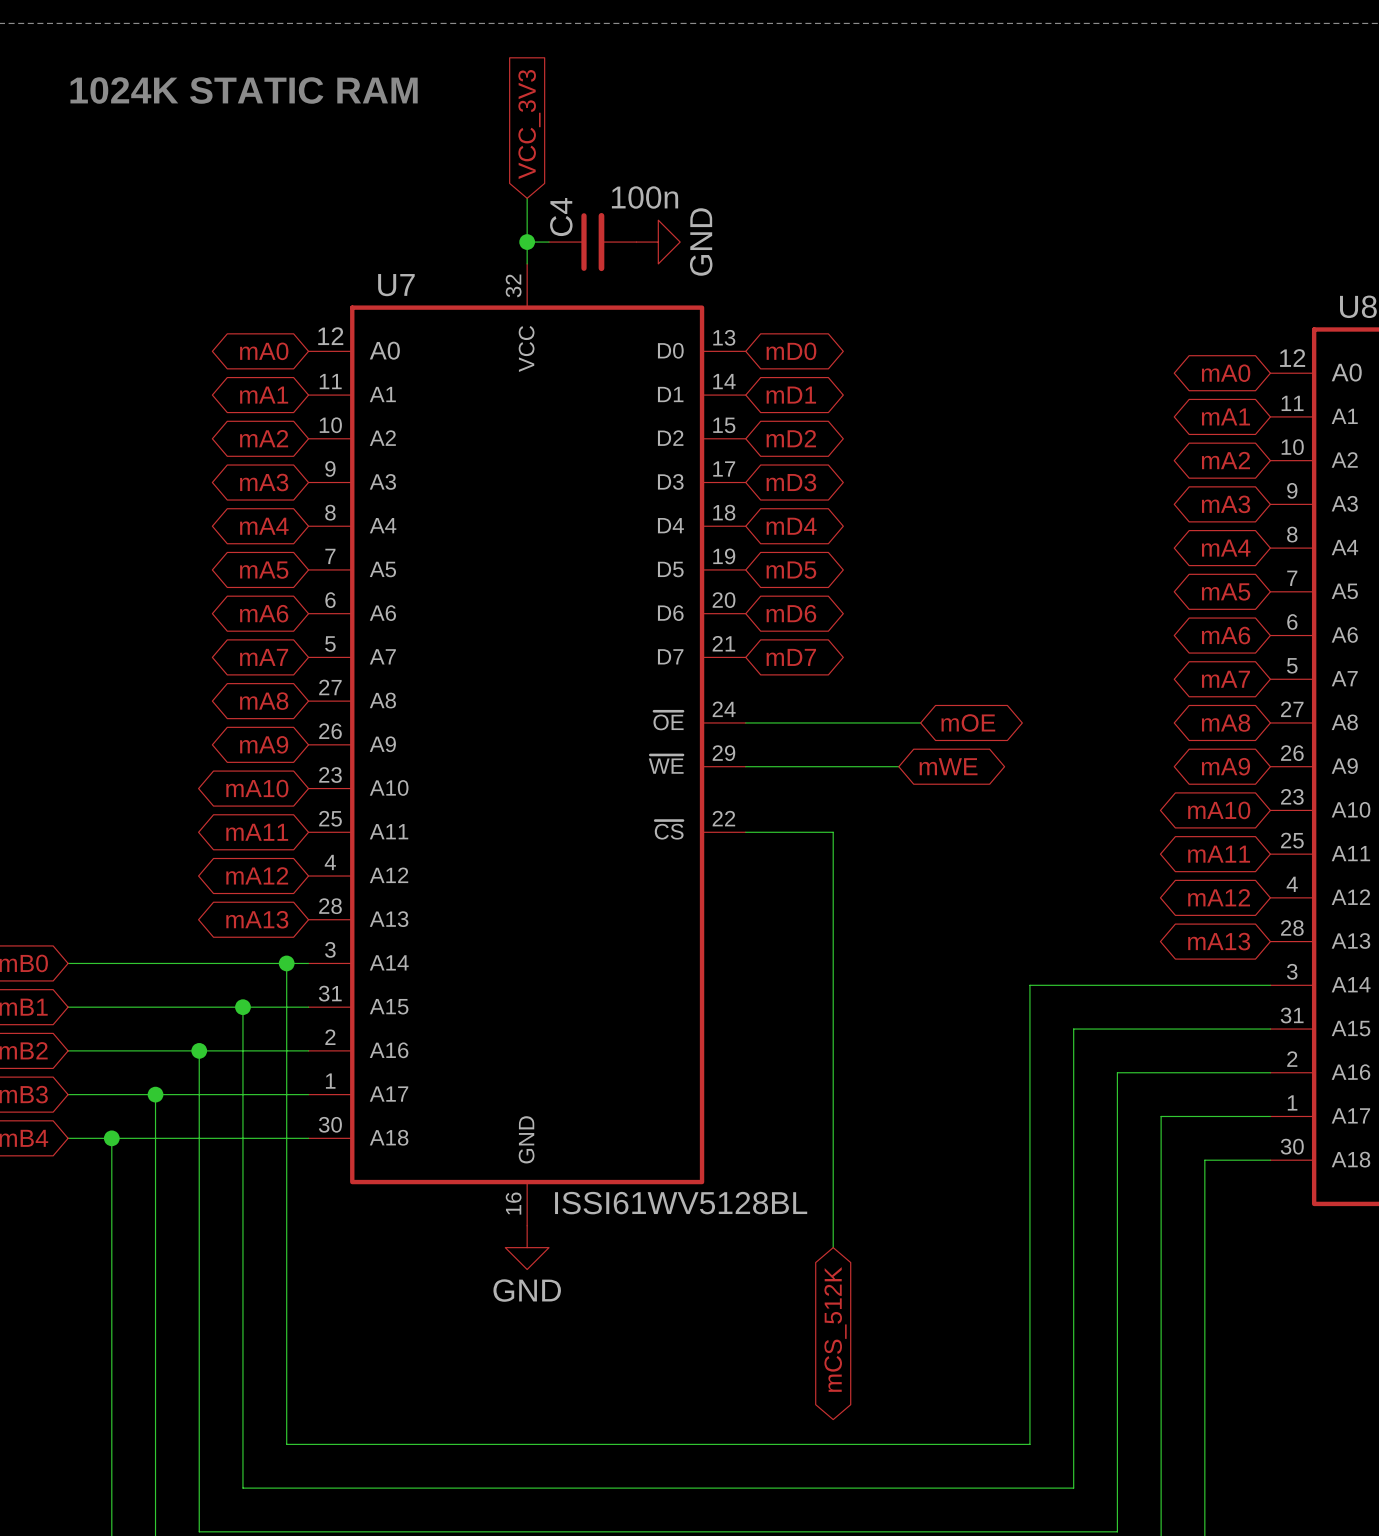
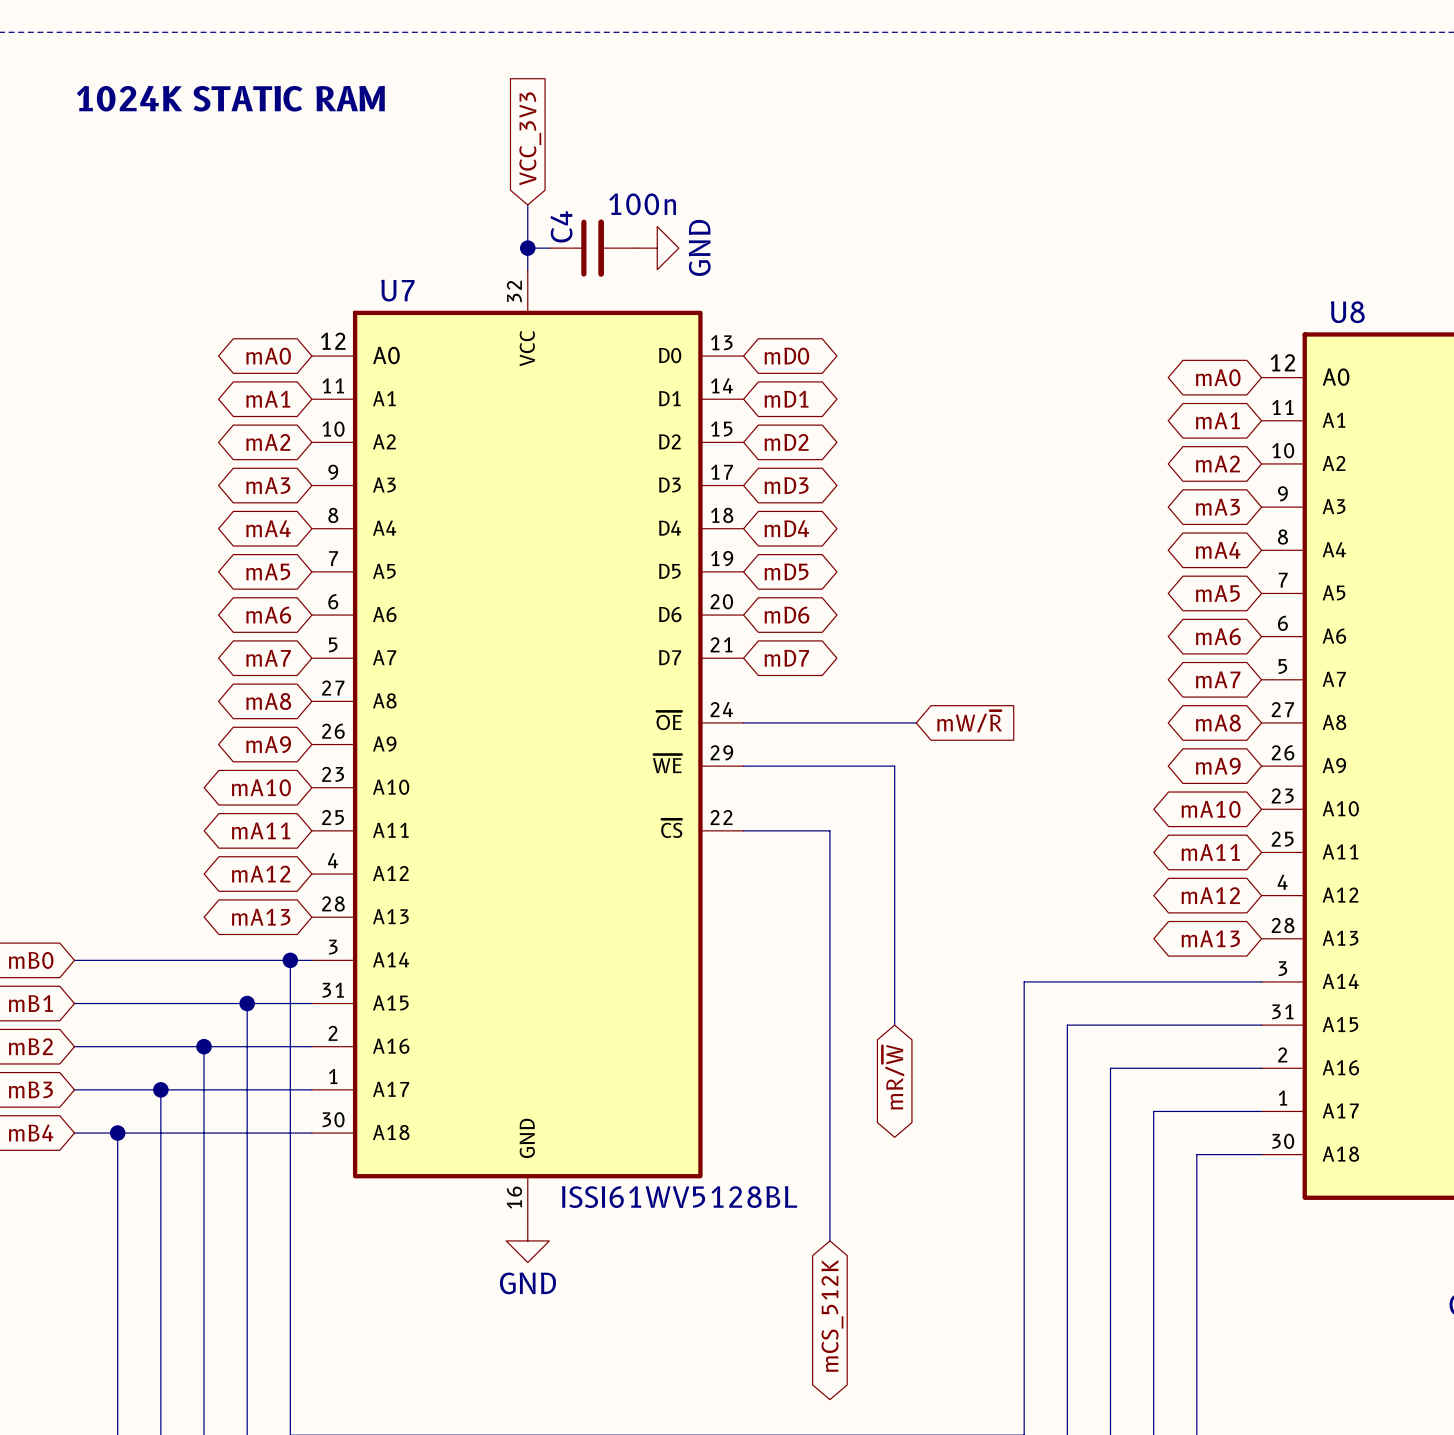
global label shape: bidirectional (968, 722) -> input (969, 721)
global label: mOE (968, 722) -> mW/~{R} (969, 721)
wire: none -> (894, 766) (894, 1025)
global label: mWE (948, 766) -> none
global label: none -> mR/~{W} (893, 1077)

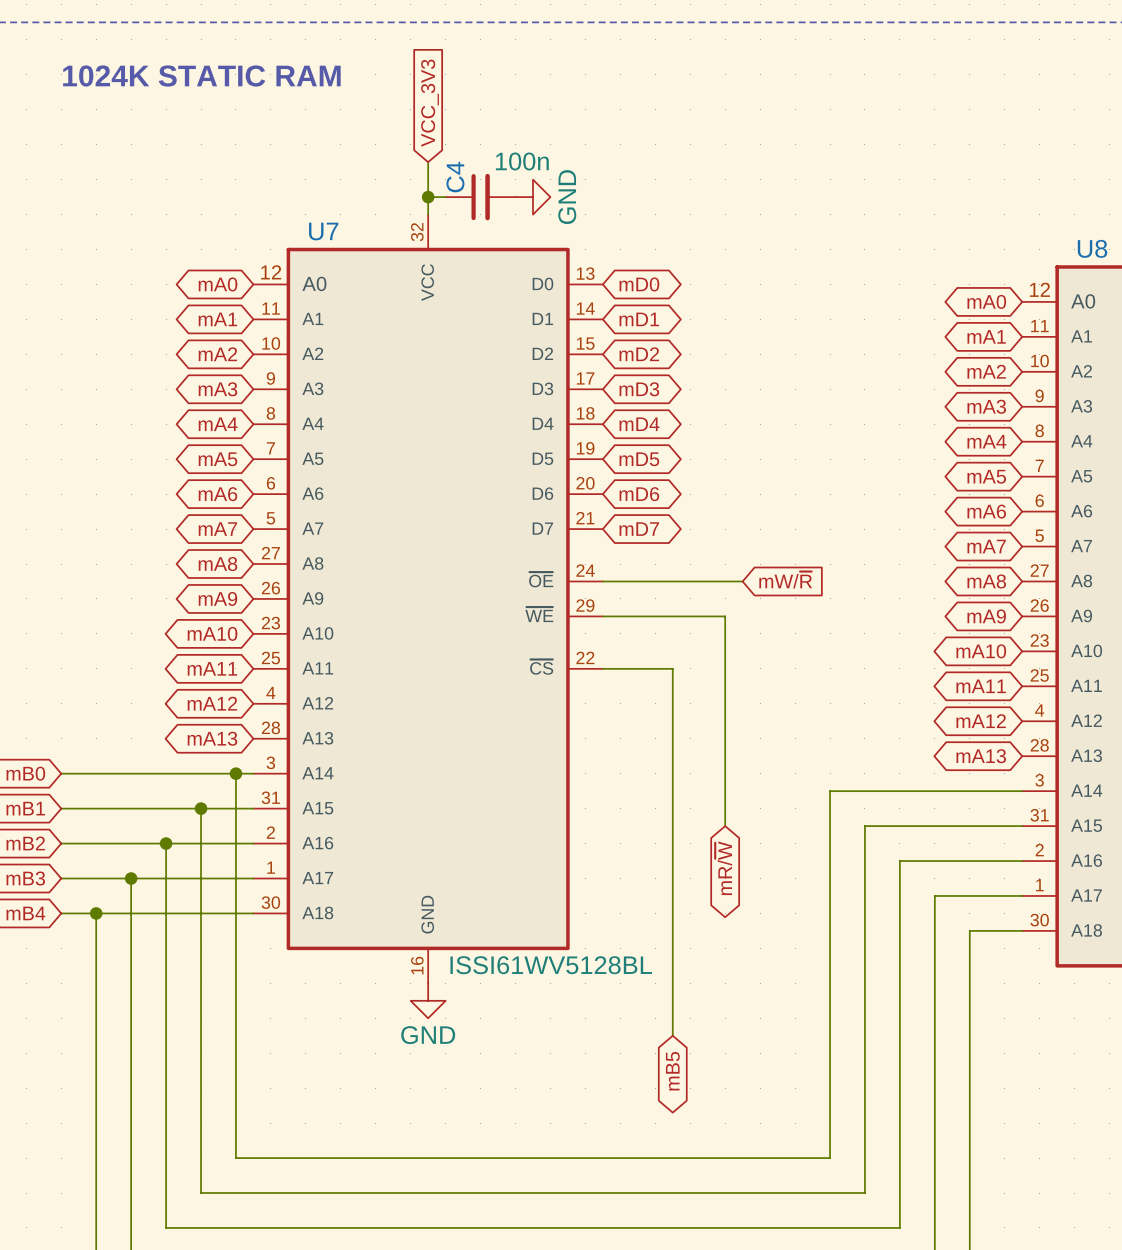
wire: none -> (672, 1000) (672, 1035)
global label: mCS_512K (832, 1315) -> none
global label: none -> mB5 (672, 1071)

